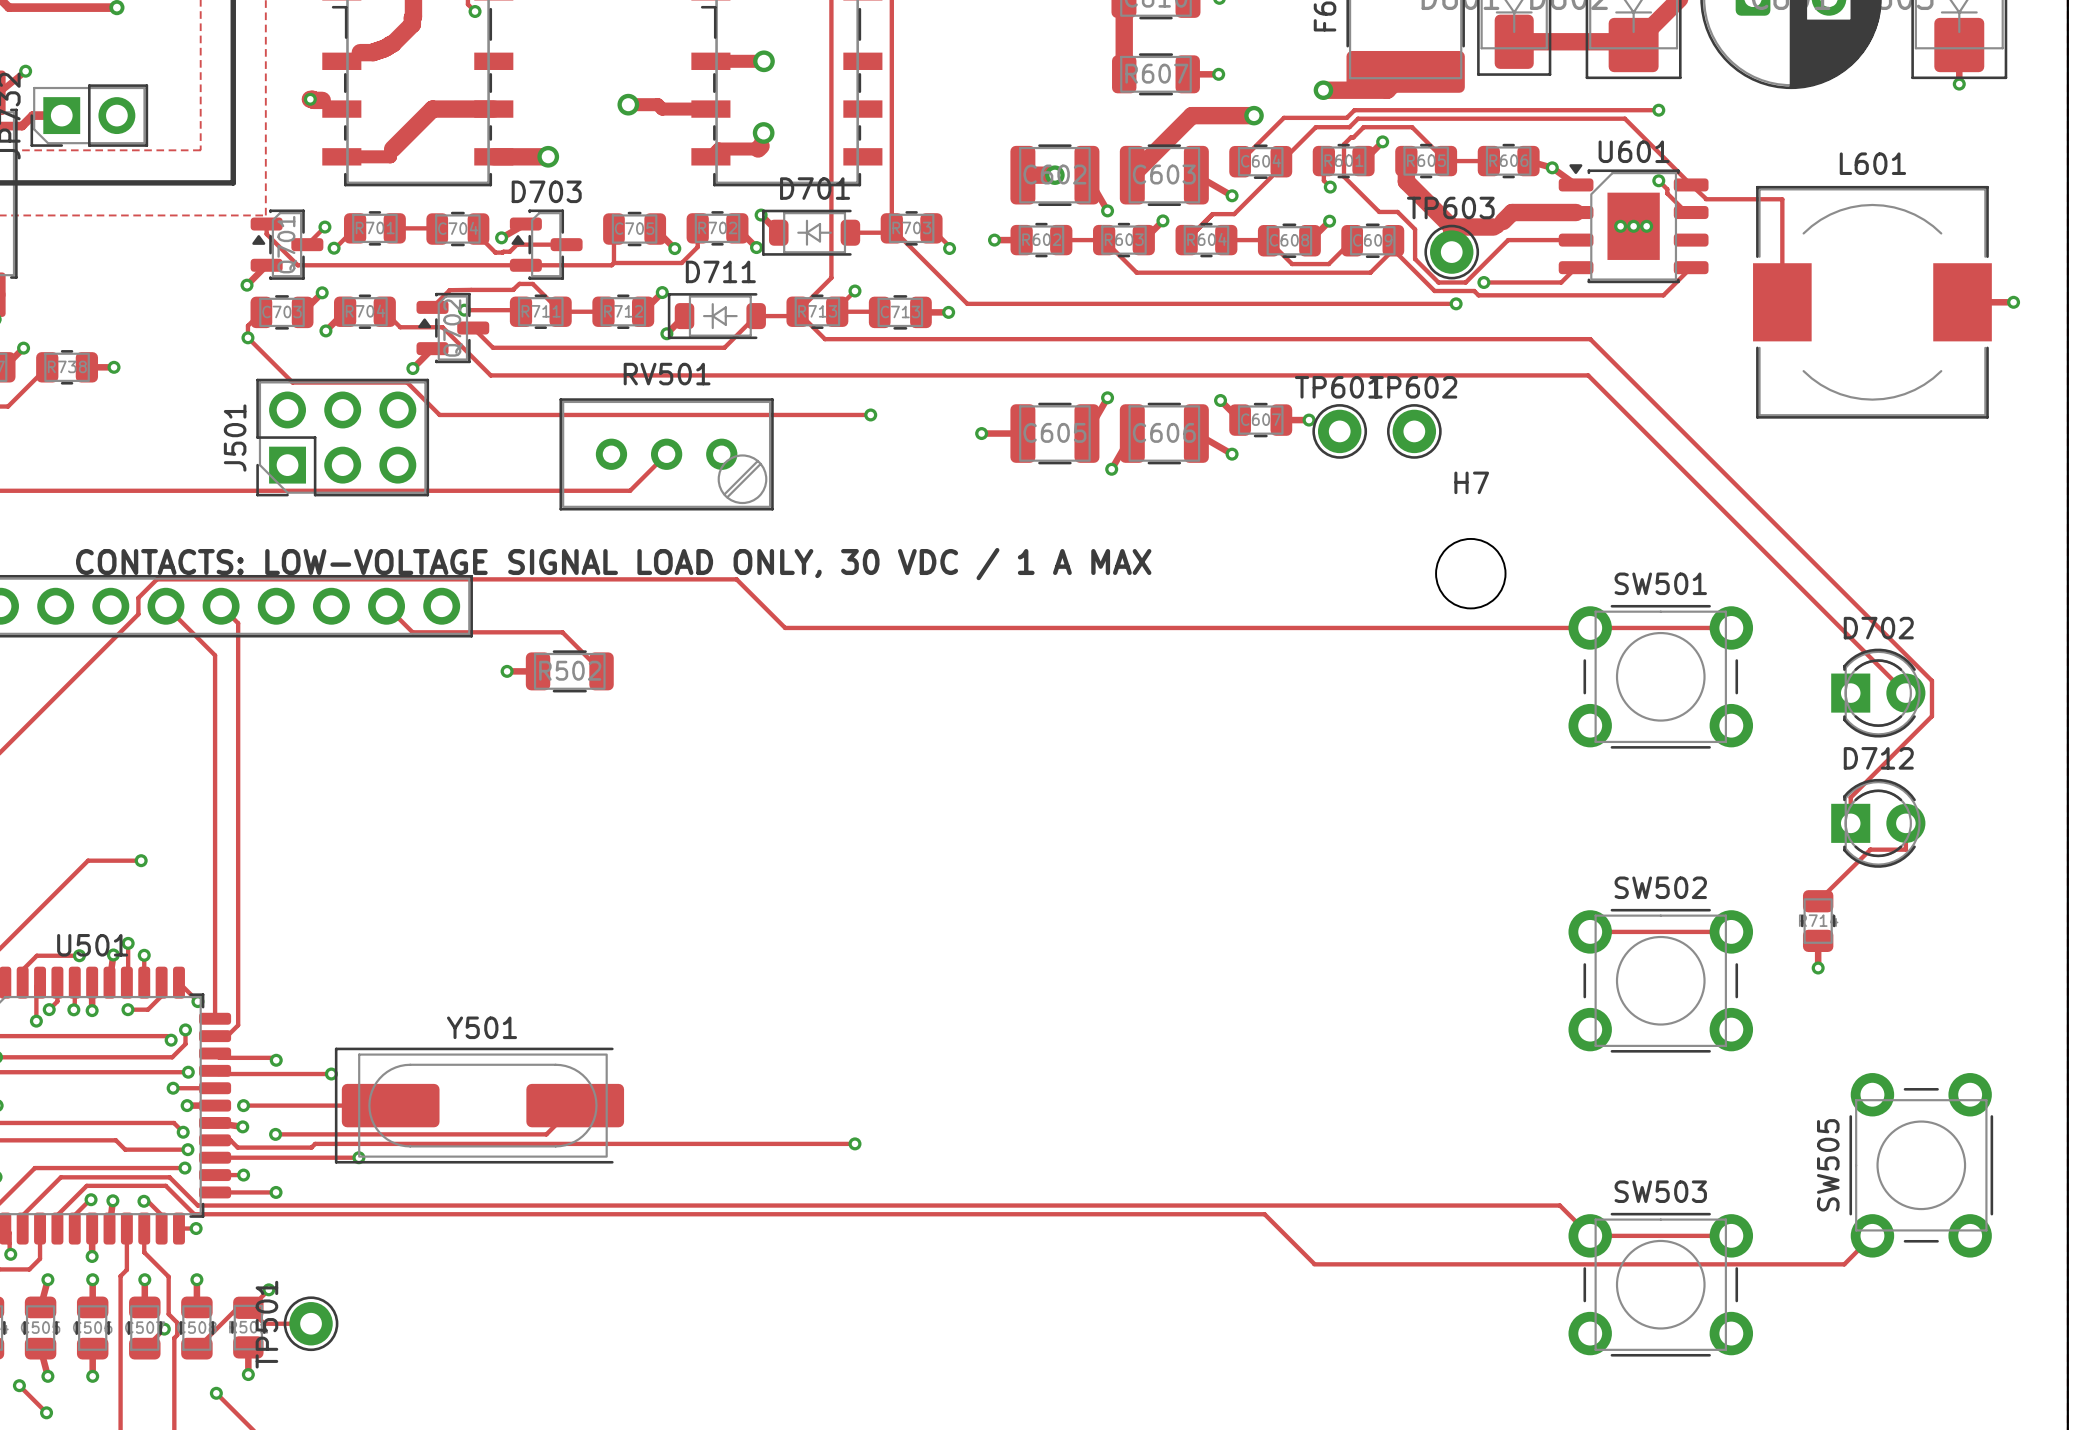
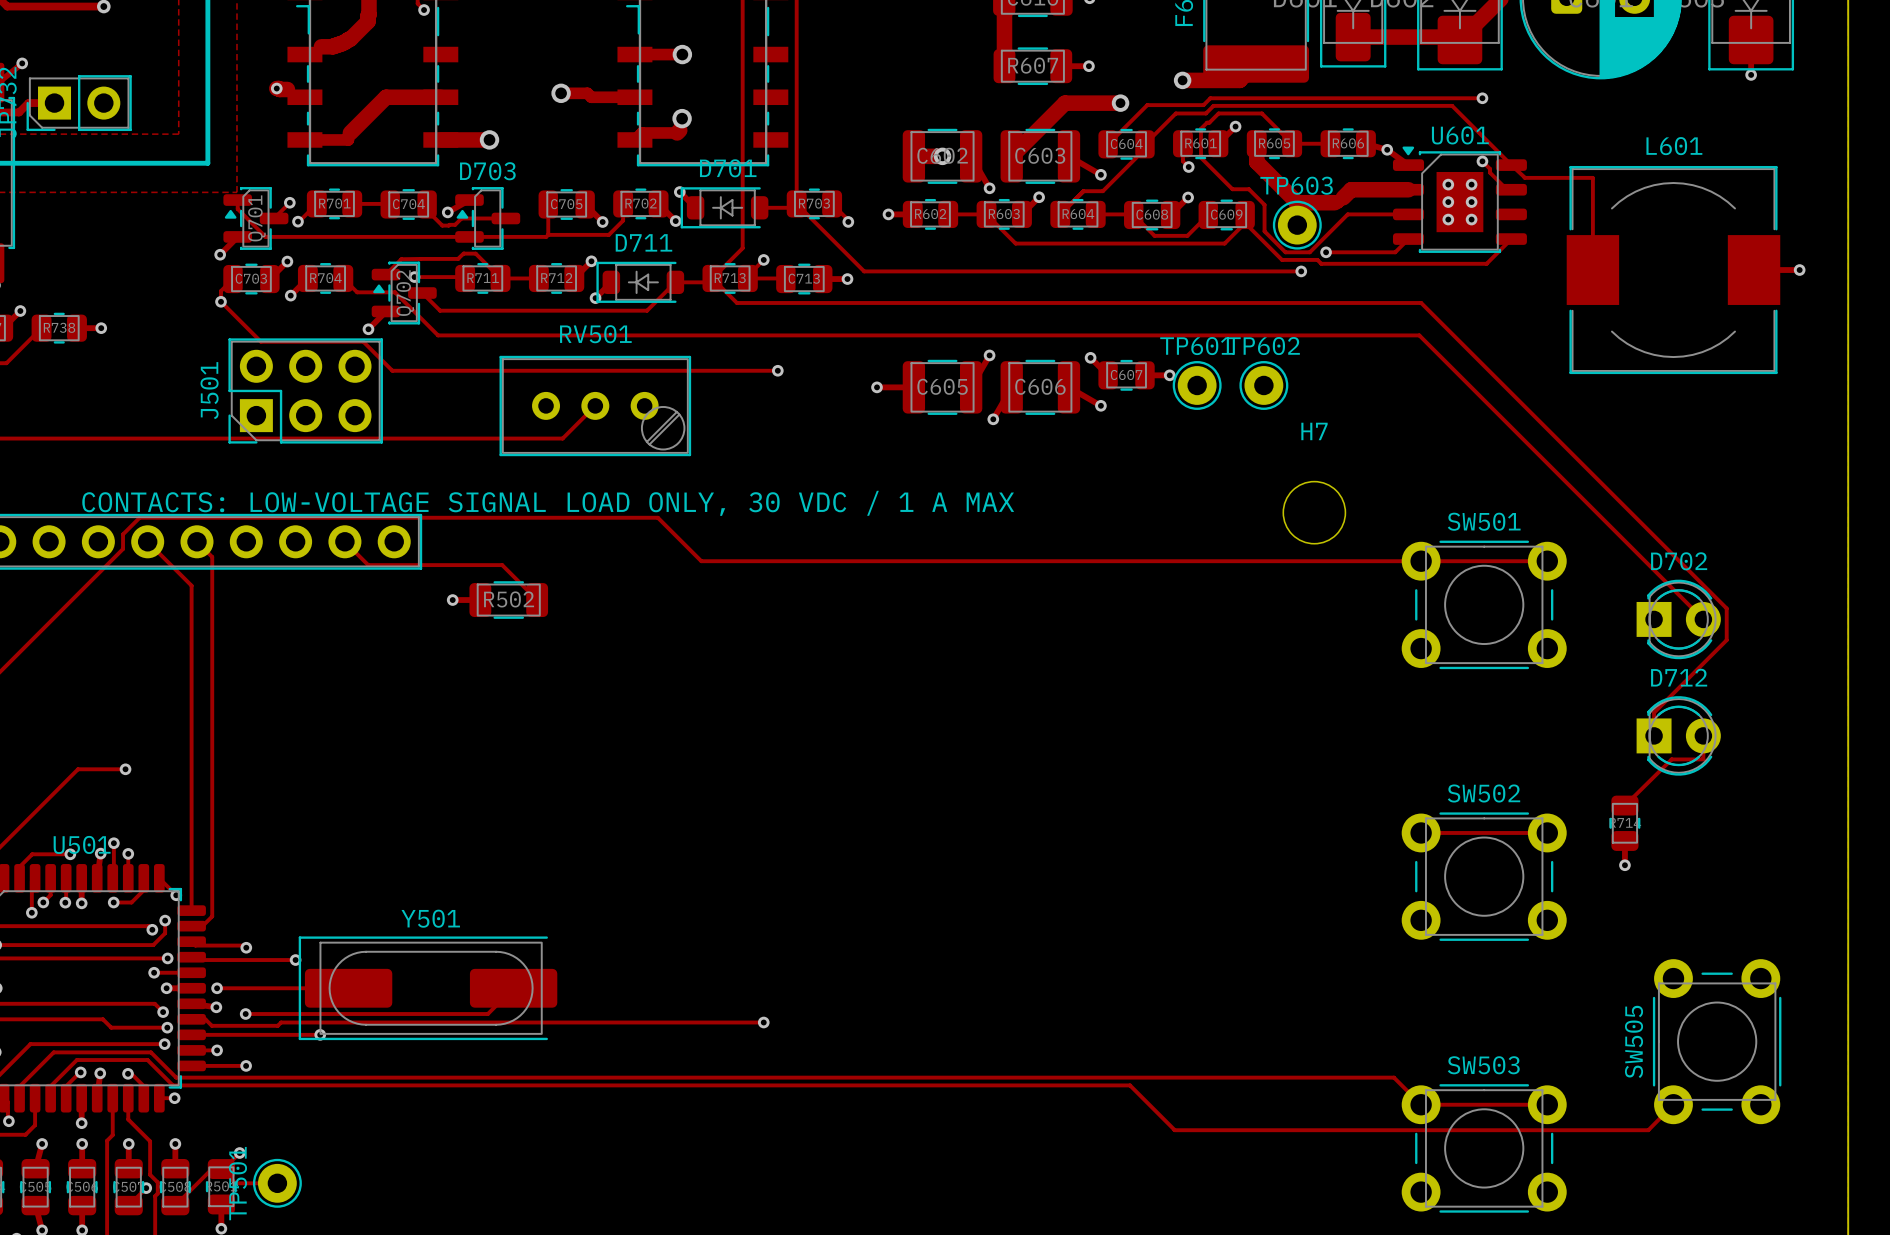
via: none -> (1448, 184)
via: none -> (1471, 184)
via: (1633, 226) -> none
via: none -> (1448, 219)
via: none -> (1471, 219)

